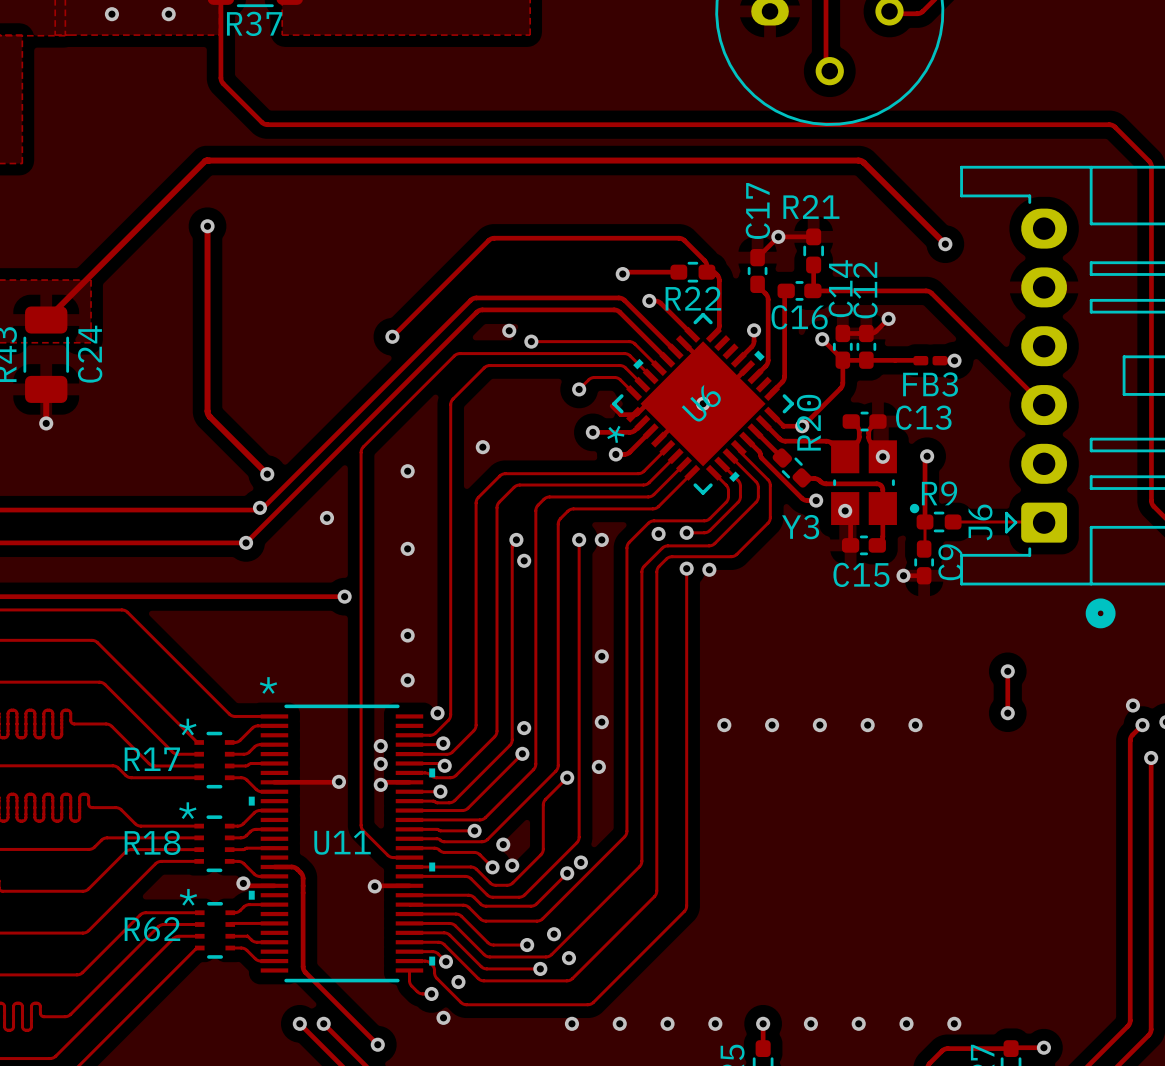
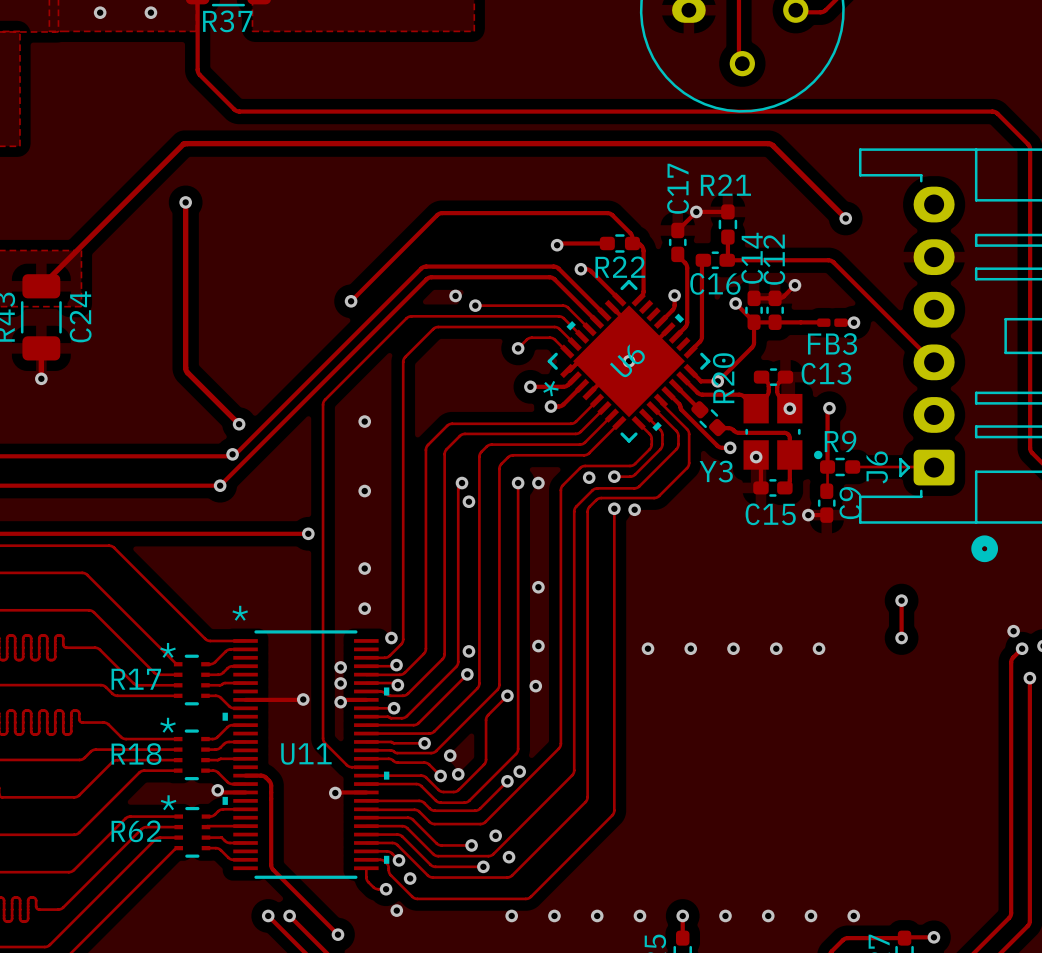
track: (612, 406) (620, 414) (634, 414) -> none
via: (482, 447) -> none
via: (326, 517) -> none

